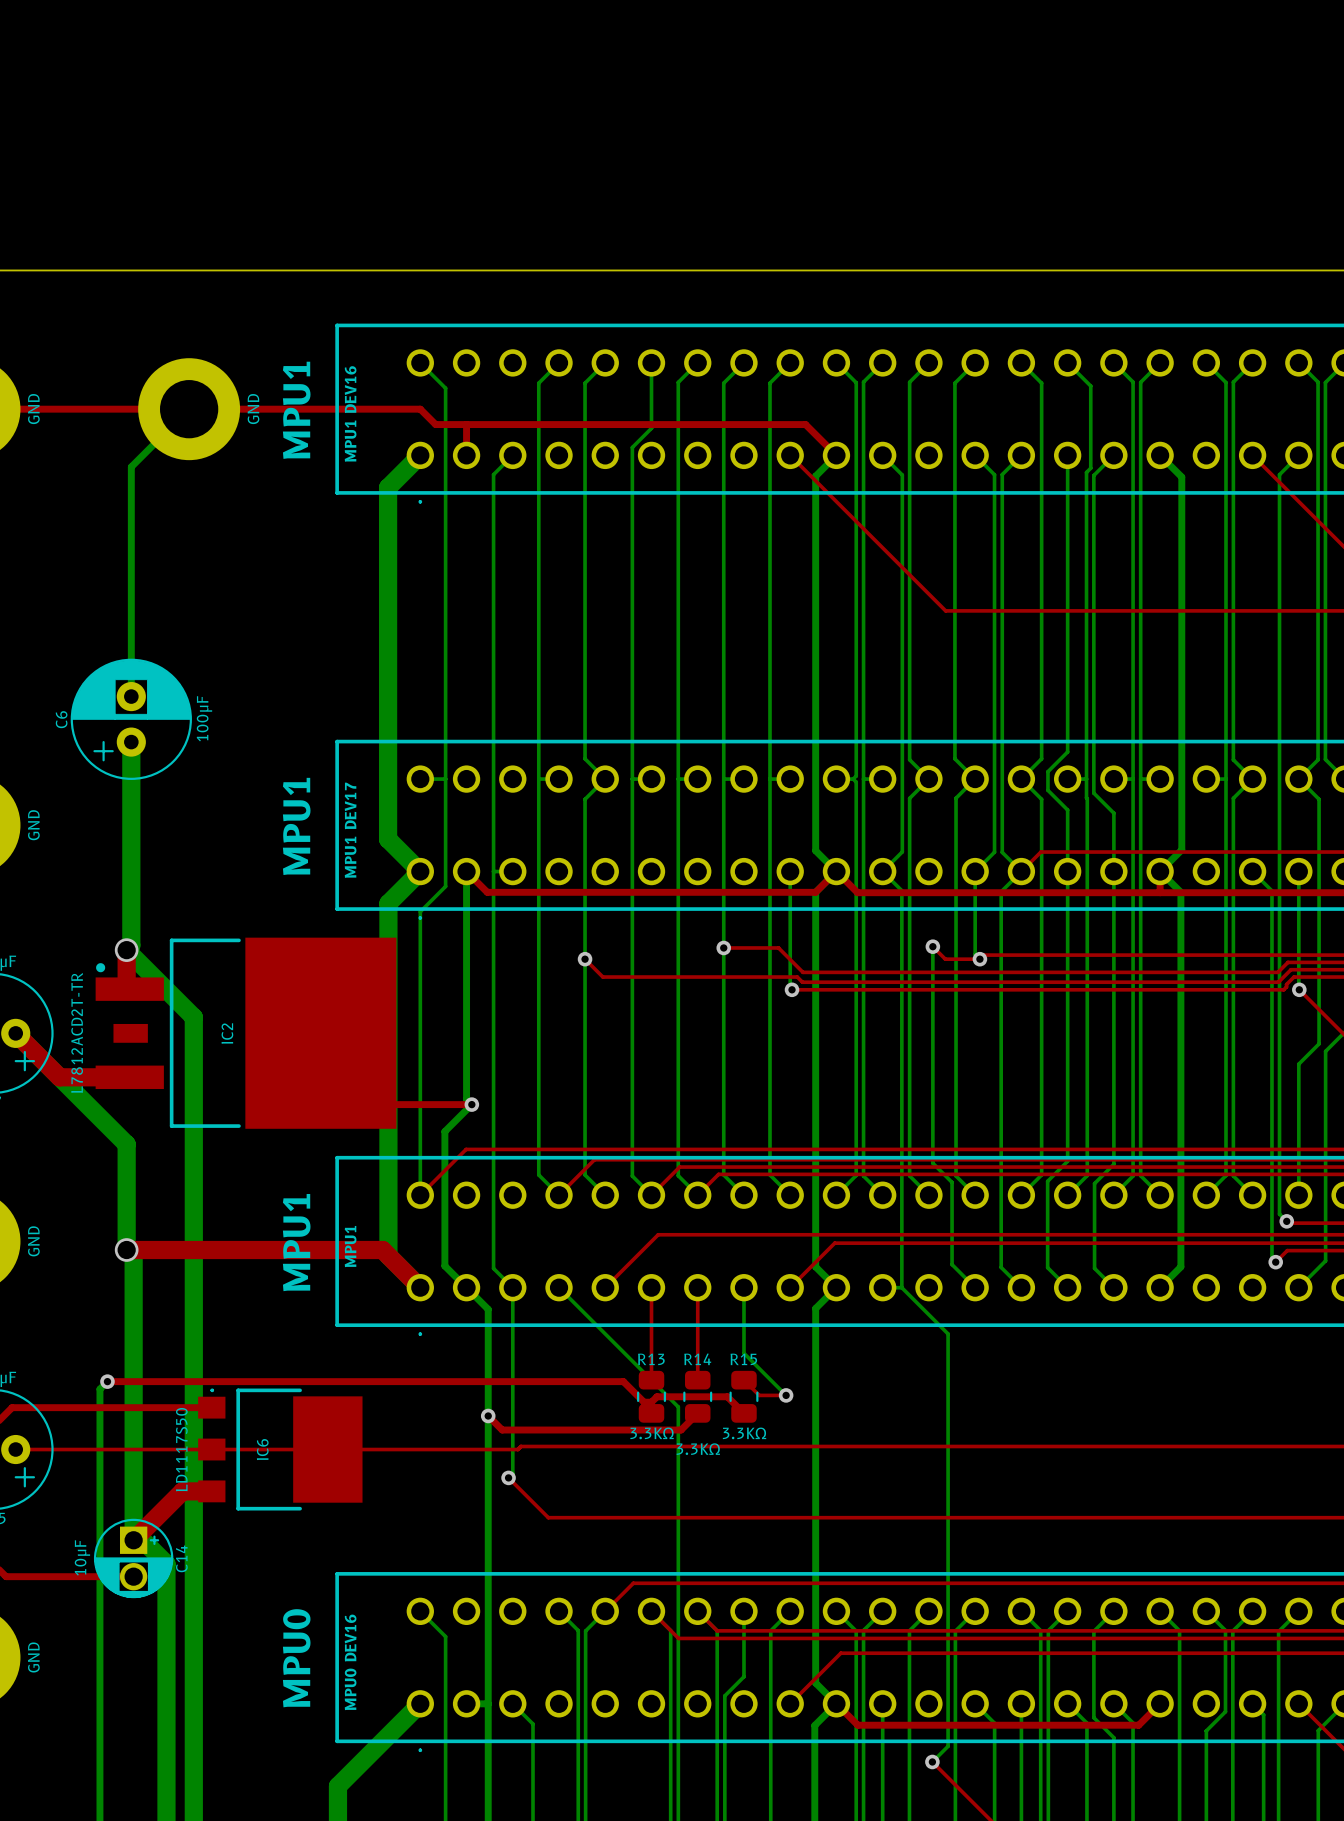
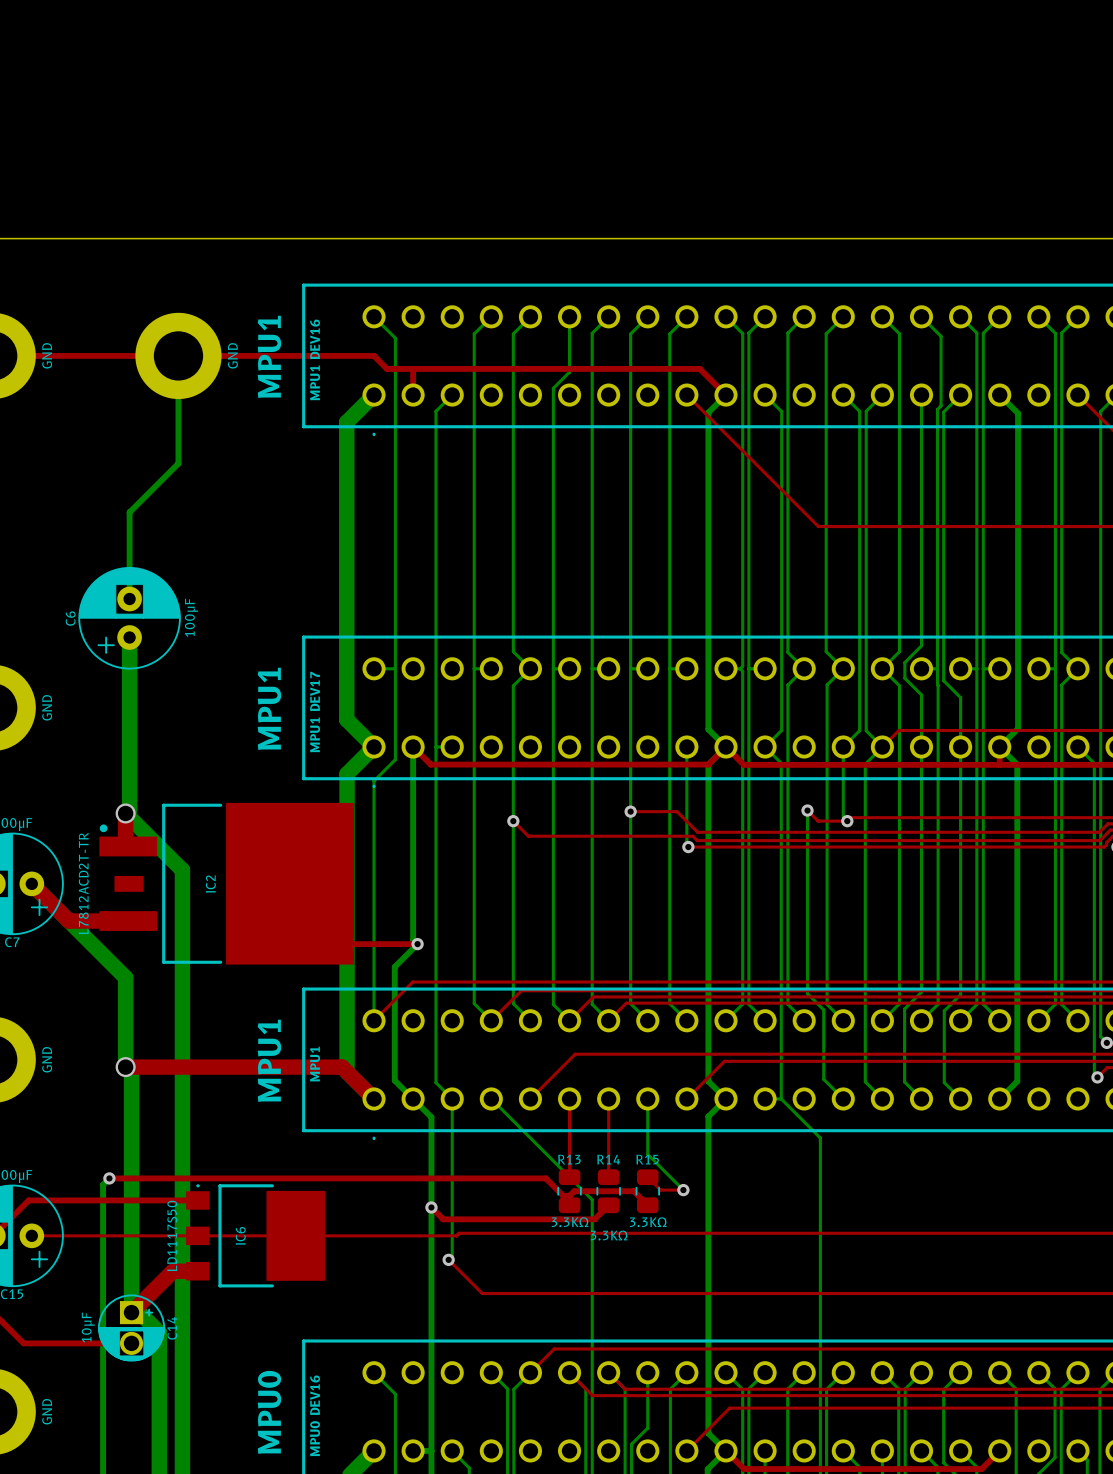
bottom track: (189, 409) (131, 466) (131, 594) -> (178, 355) (178, 463) (129, 512)

